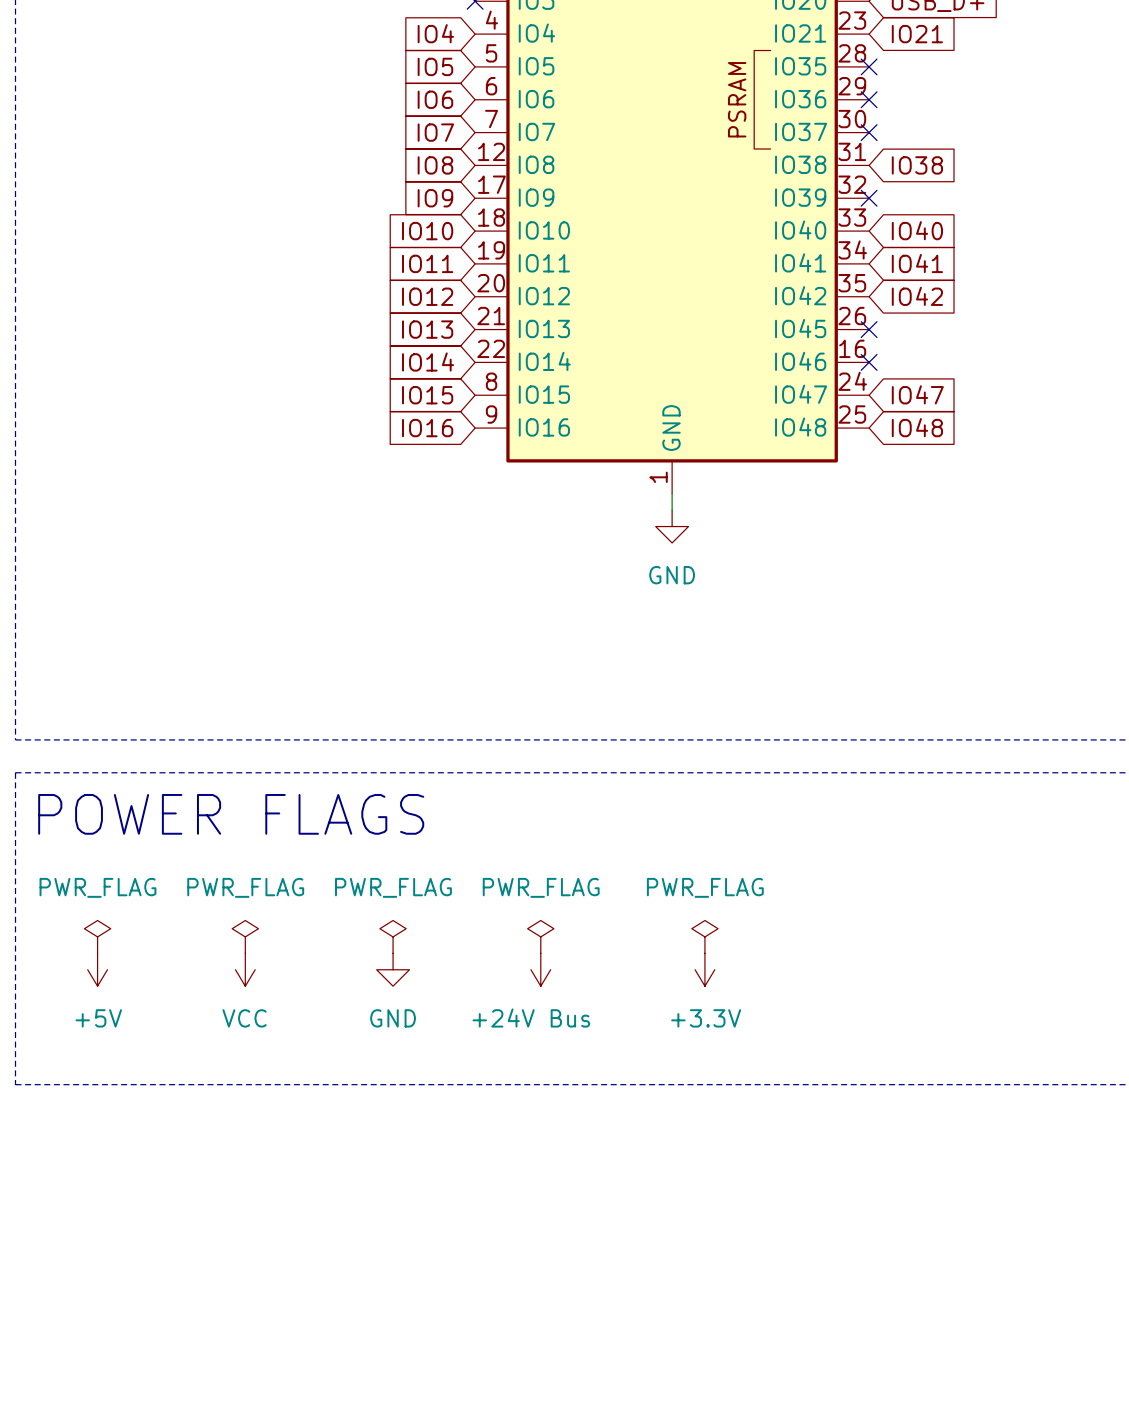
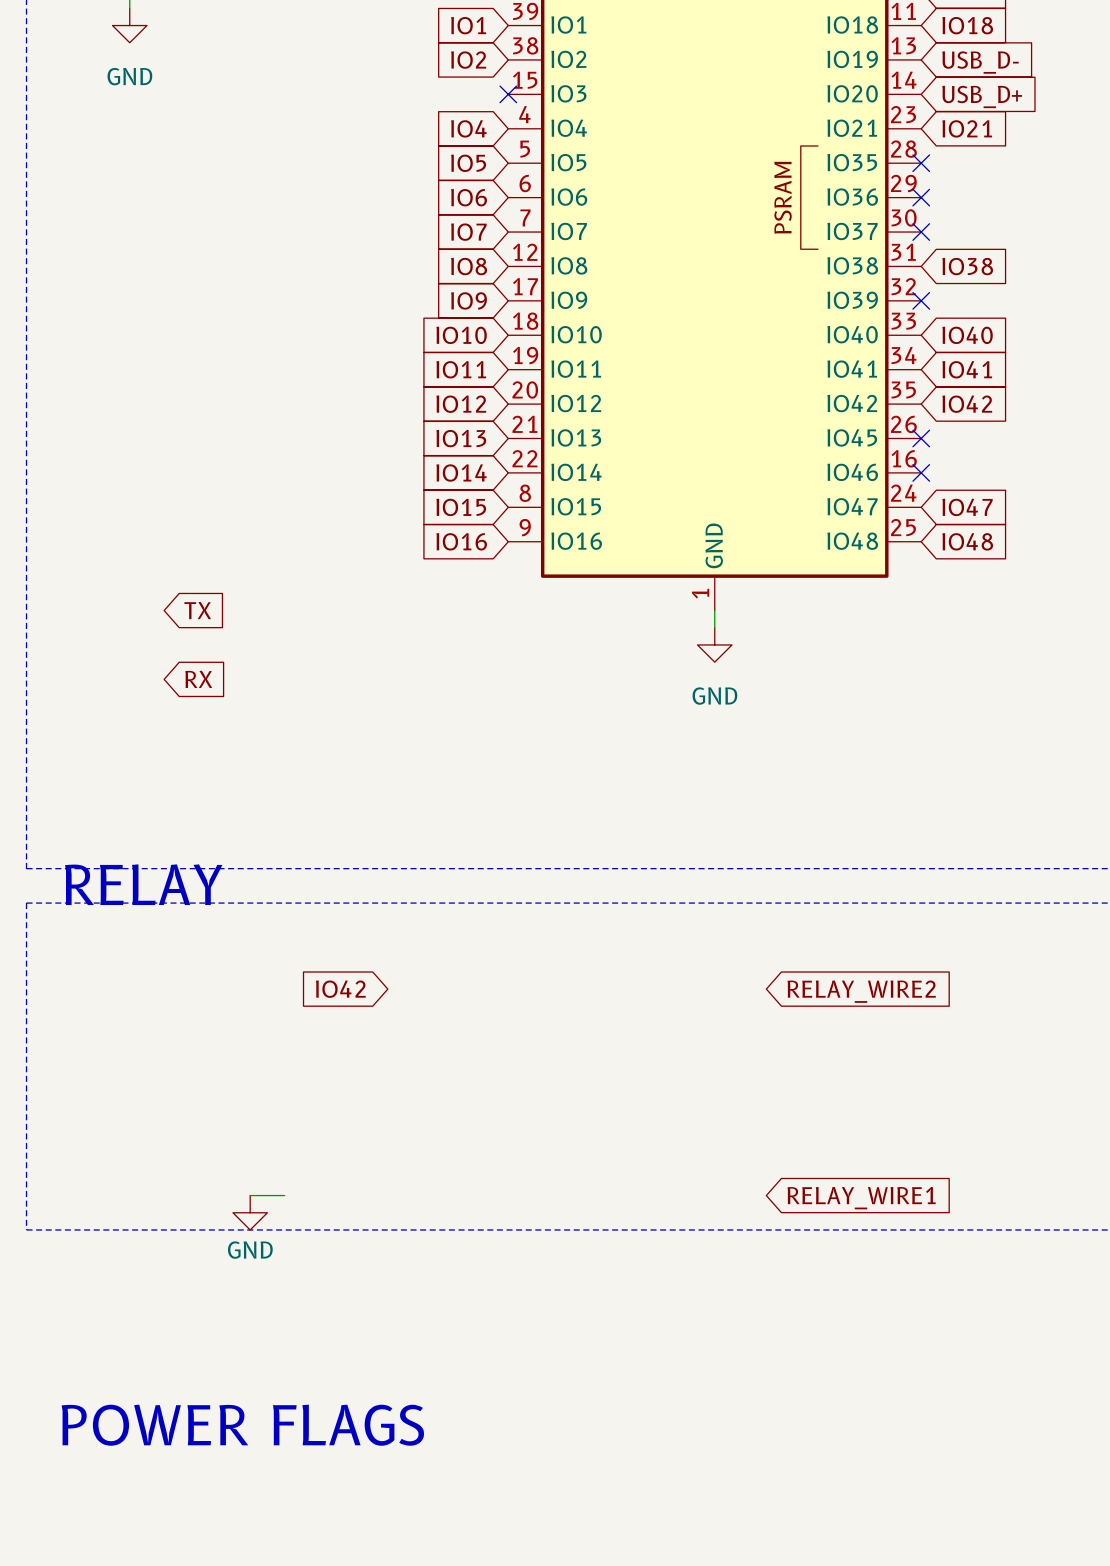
global label: none -> TX (197, 610)
global label: none -> RX (198, 679)
text: none -> RELAY (143, 884)
text: POWER FLAGS (231, 814) -> none
global label: none -> IO42 (340, 989)
global label: none -> RELAY_WIRE2 (861, 991)
power symbol: PWR_FLAG (97, 936) -> none
power symbol: PWR_FLAG (245, 936) -> none
power symbol: PWR_FLAG (393, 936) -> none
power symbol: PWR_FLAG (540, 936) -> none
power symbol: PWR_FLAG (704, 936) -> none
power symbol: +5V (97, 969) -> none
power symbol: VCC (245, 969) -> none
power symbol position: GND (393, 969) -> GND (250, 1212)
power symbol: +24V Bus (540, 969) -> none
power symbol: +3.3V (704, 969) -> none
power symbol text position: GND (393, 1018) -> GND (250, 1250)
wire: none -> (250, 1195) (284, 1195)
global label: none -> RELAY_WIRE1 (861, 1198)
text: none -> POWER FLAGS (242, 1425)

